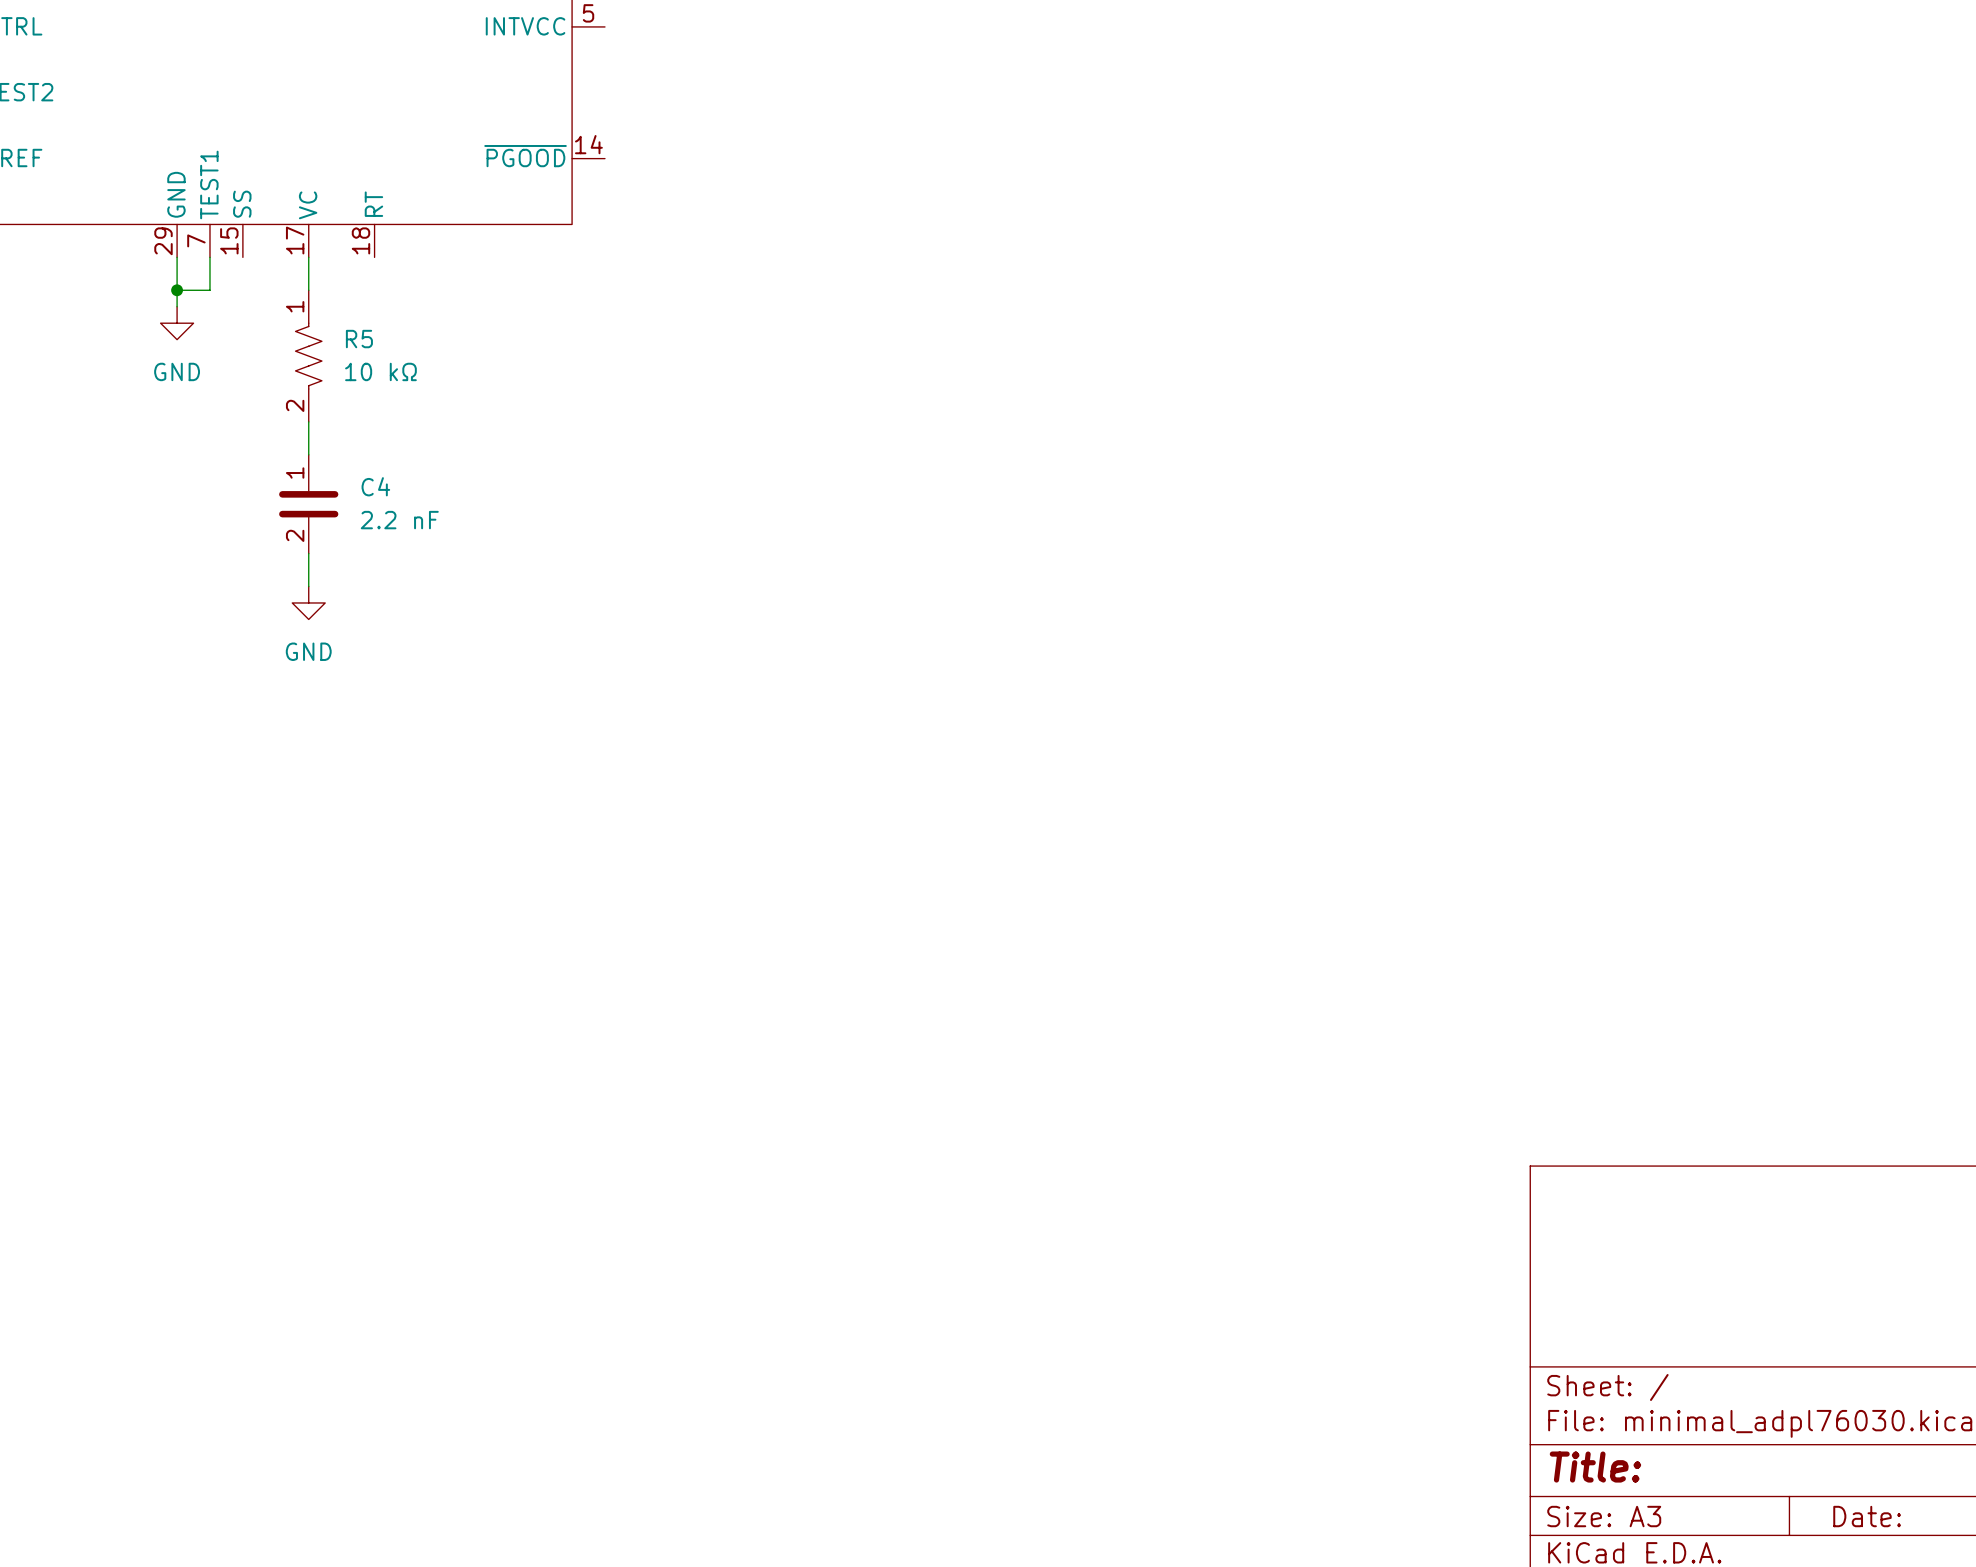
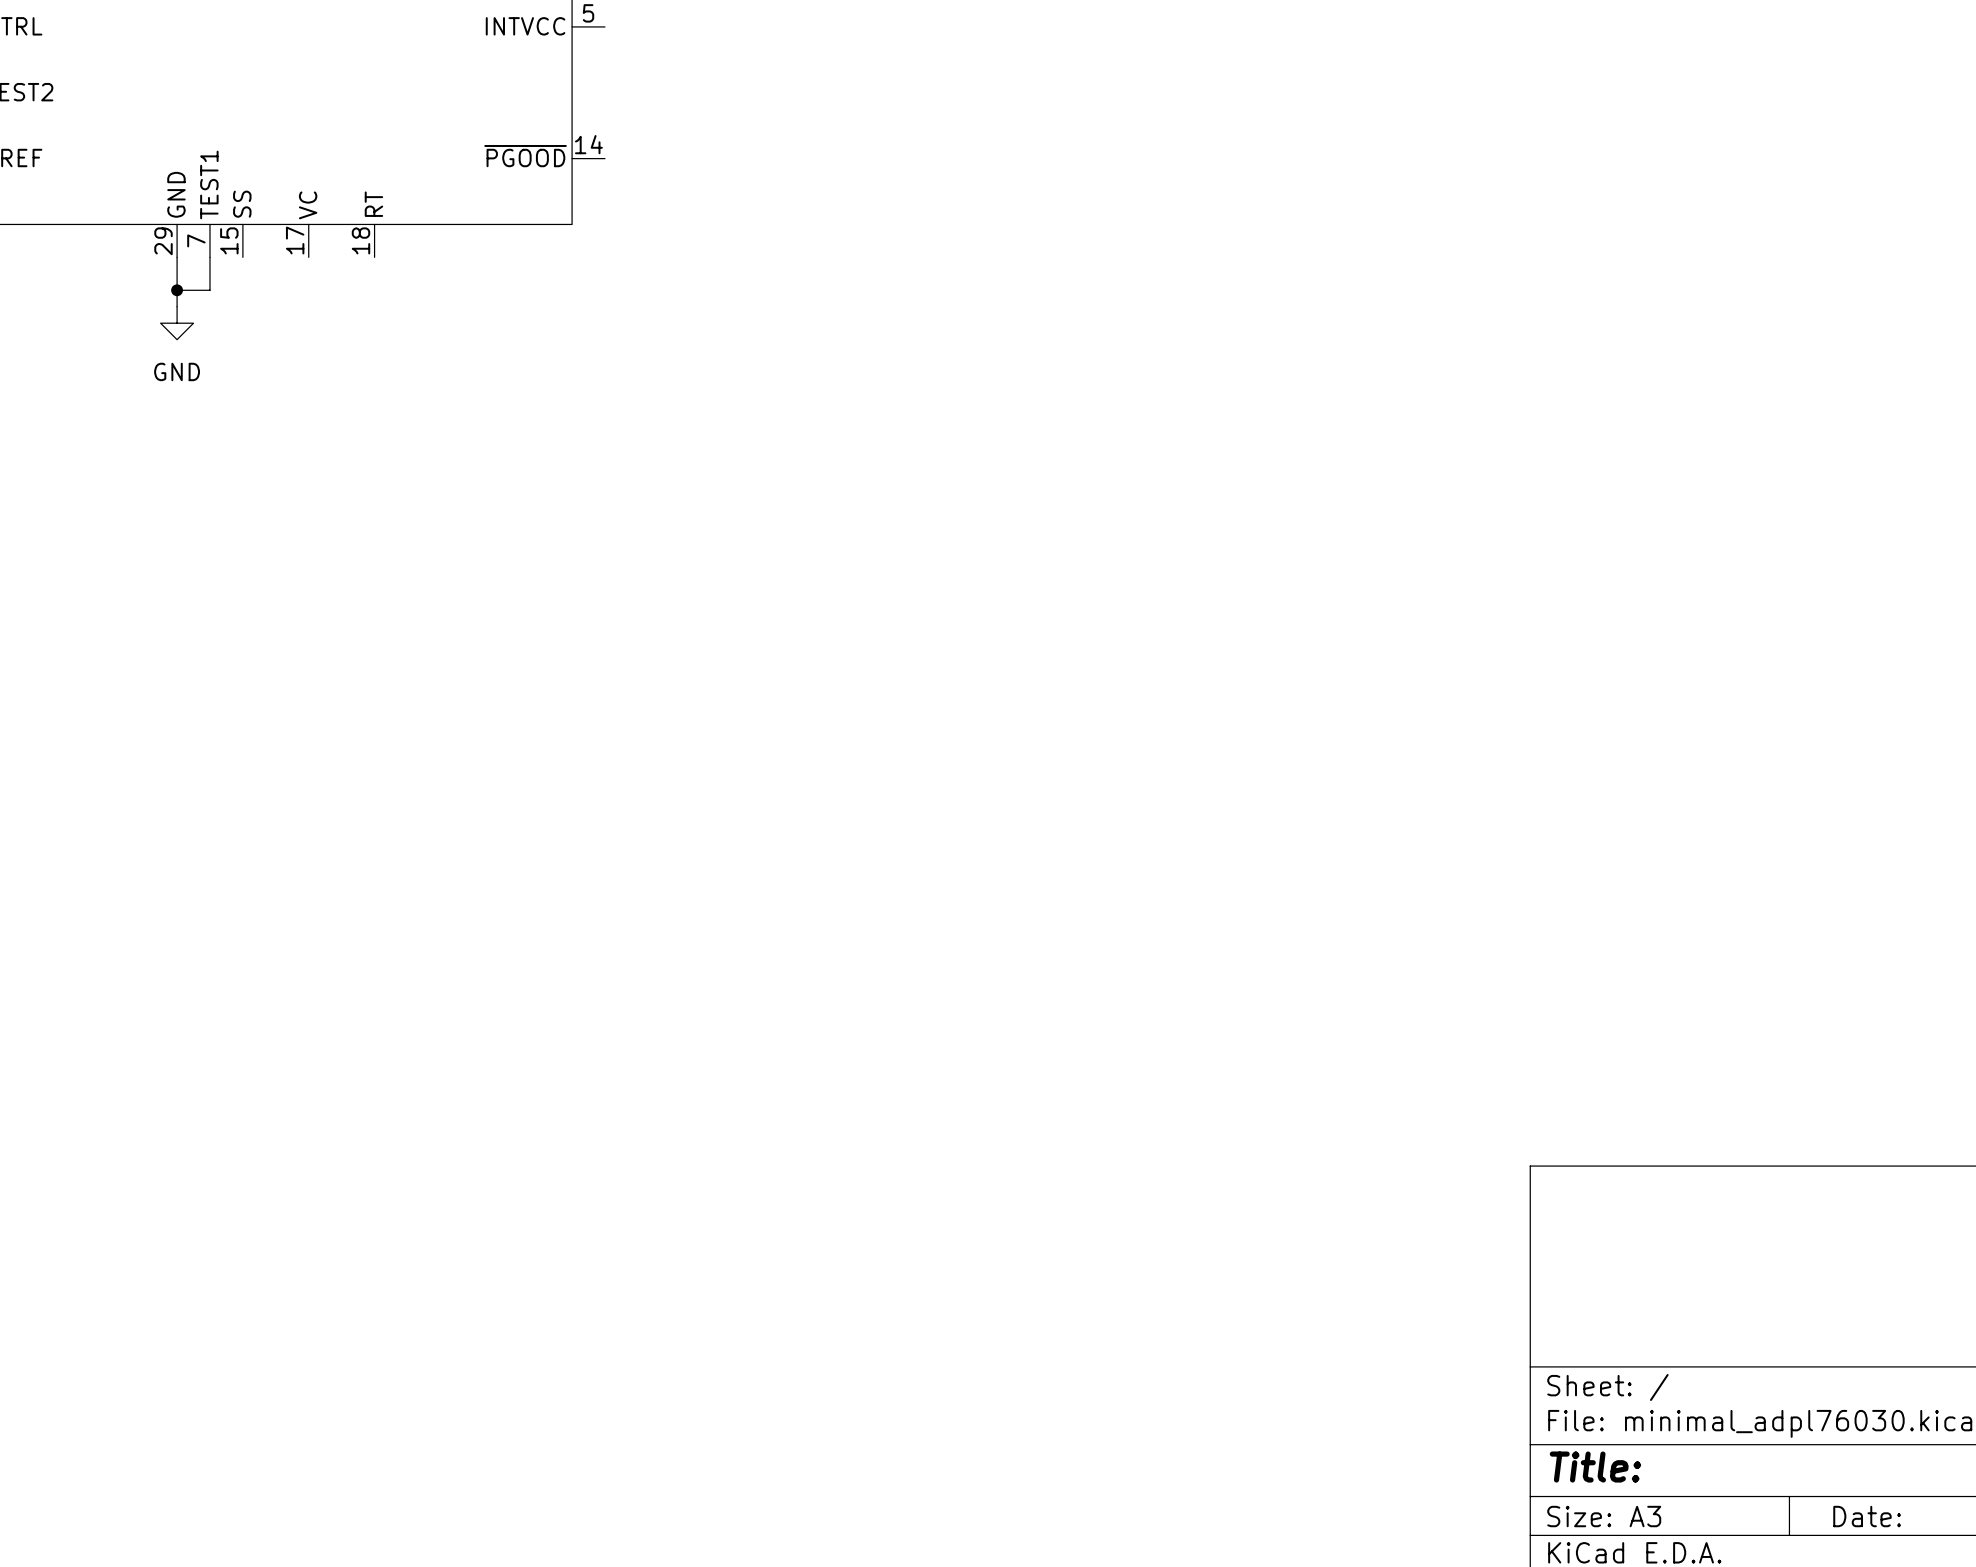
wire: (308, 257) (308, 290) -> none
R5: 10 kΩ (308, 356) -> none
wire: (308, 421) (308, 454) -> none
C4: 2.2 nF (308, 504) -> none
wire: (308, 553) (308, 586) -> none
power symbol: GND (308, 602) -> none

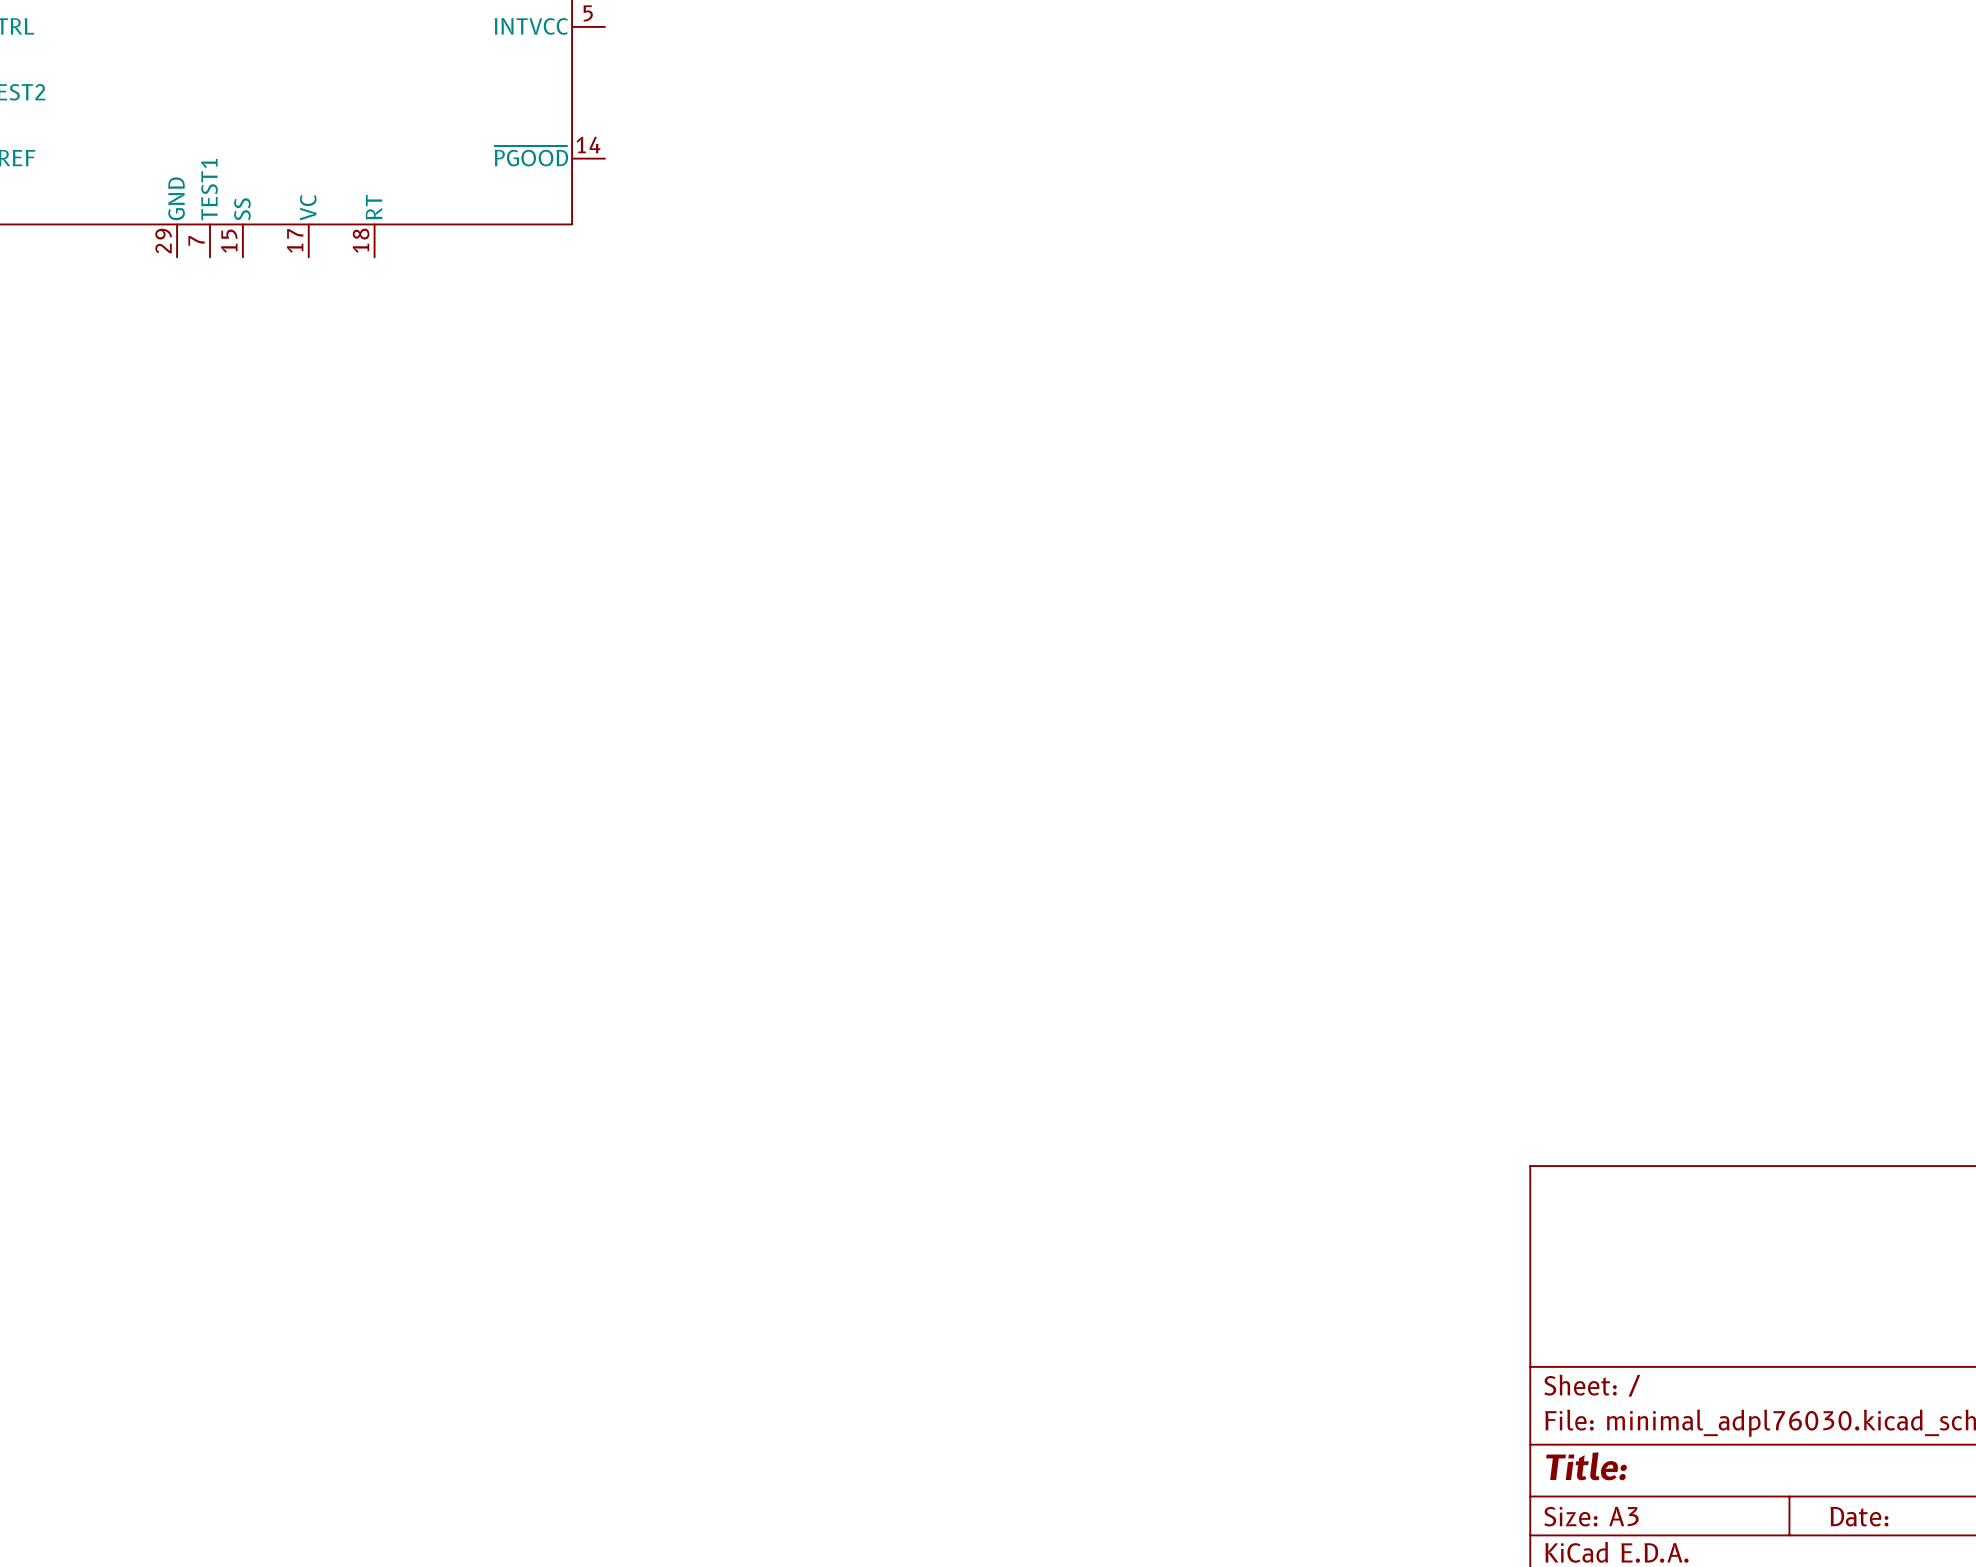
wire: (177, 257) (177, 306) -> none
wire: (209, 257) (209, 290) (177, 290) -> none
junction: (177, 290) -> none
power symbol: GND (177, 323) -> none

